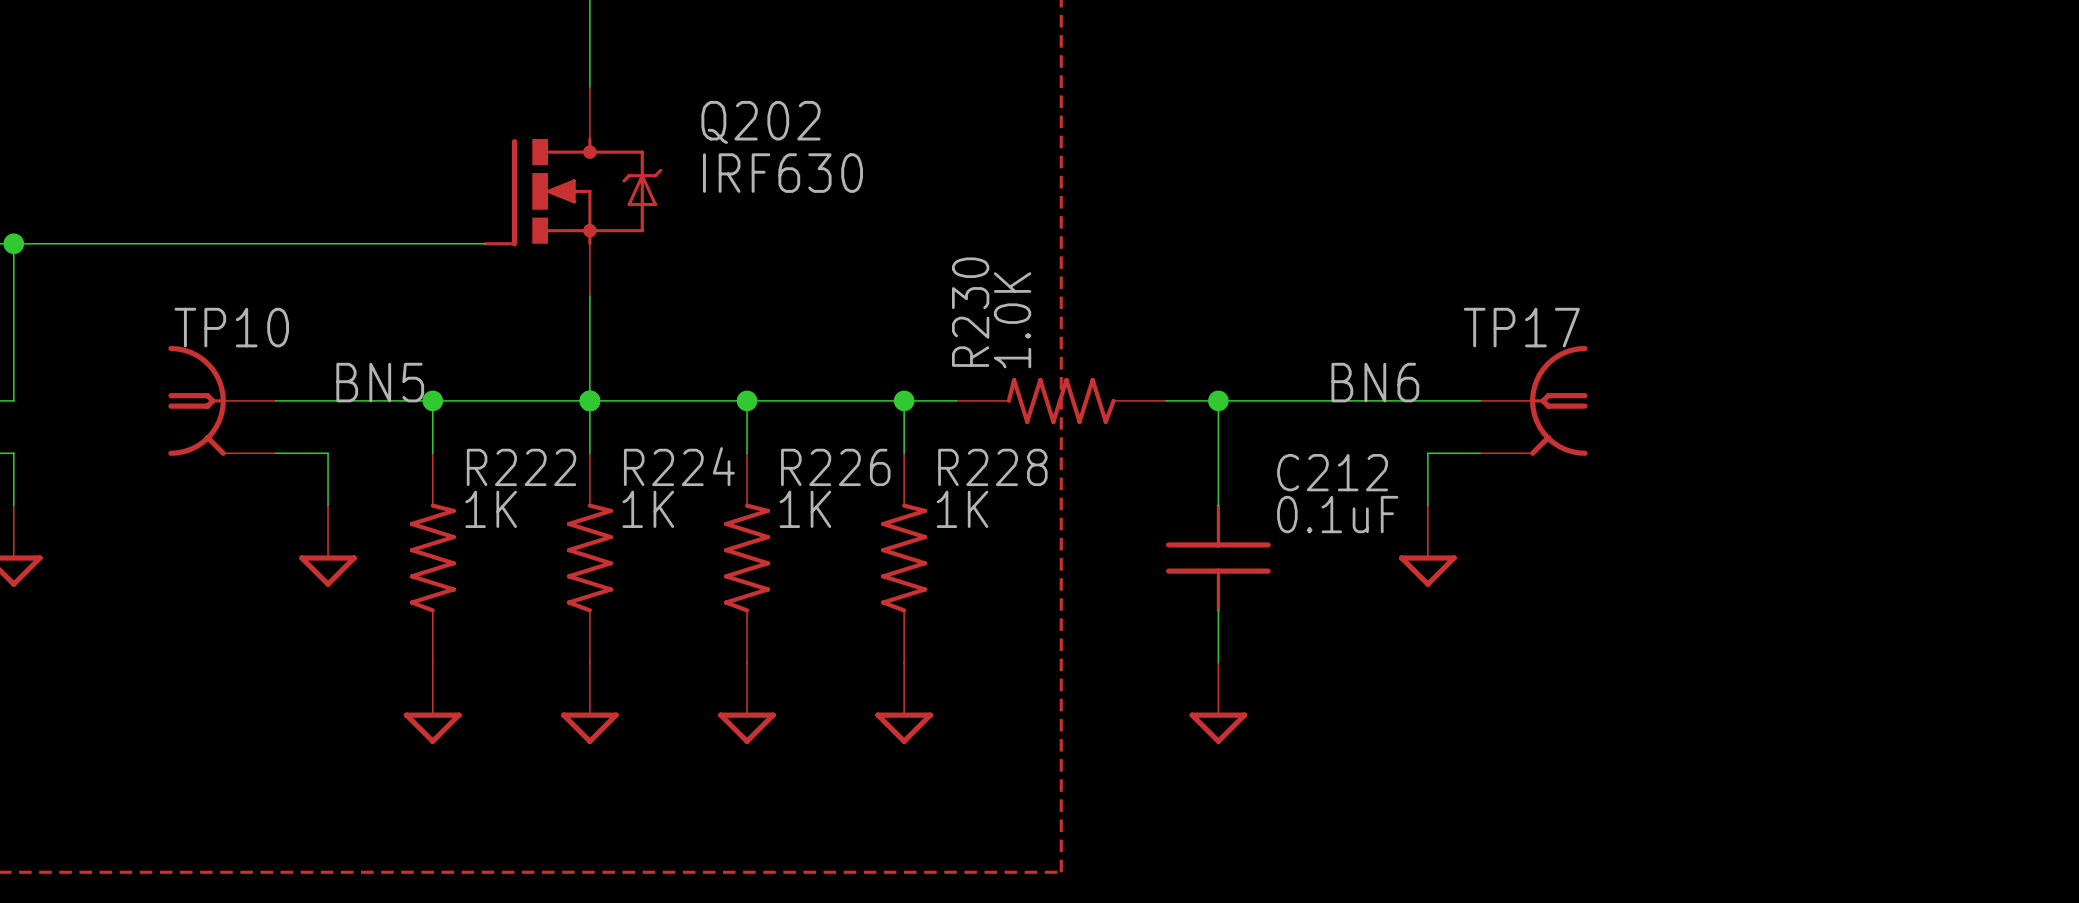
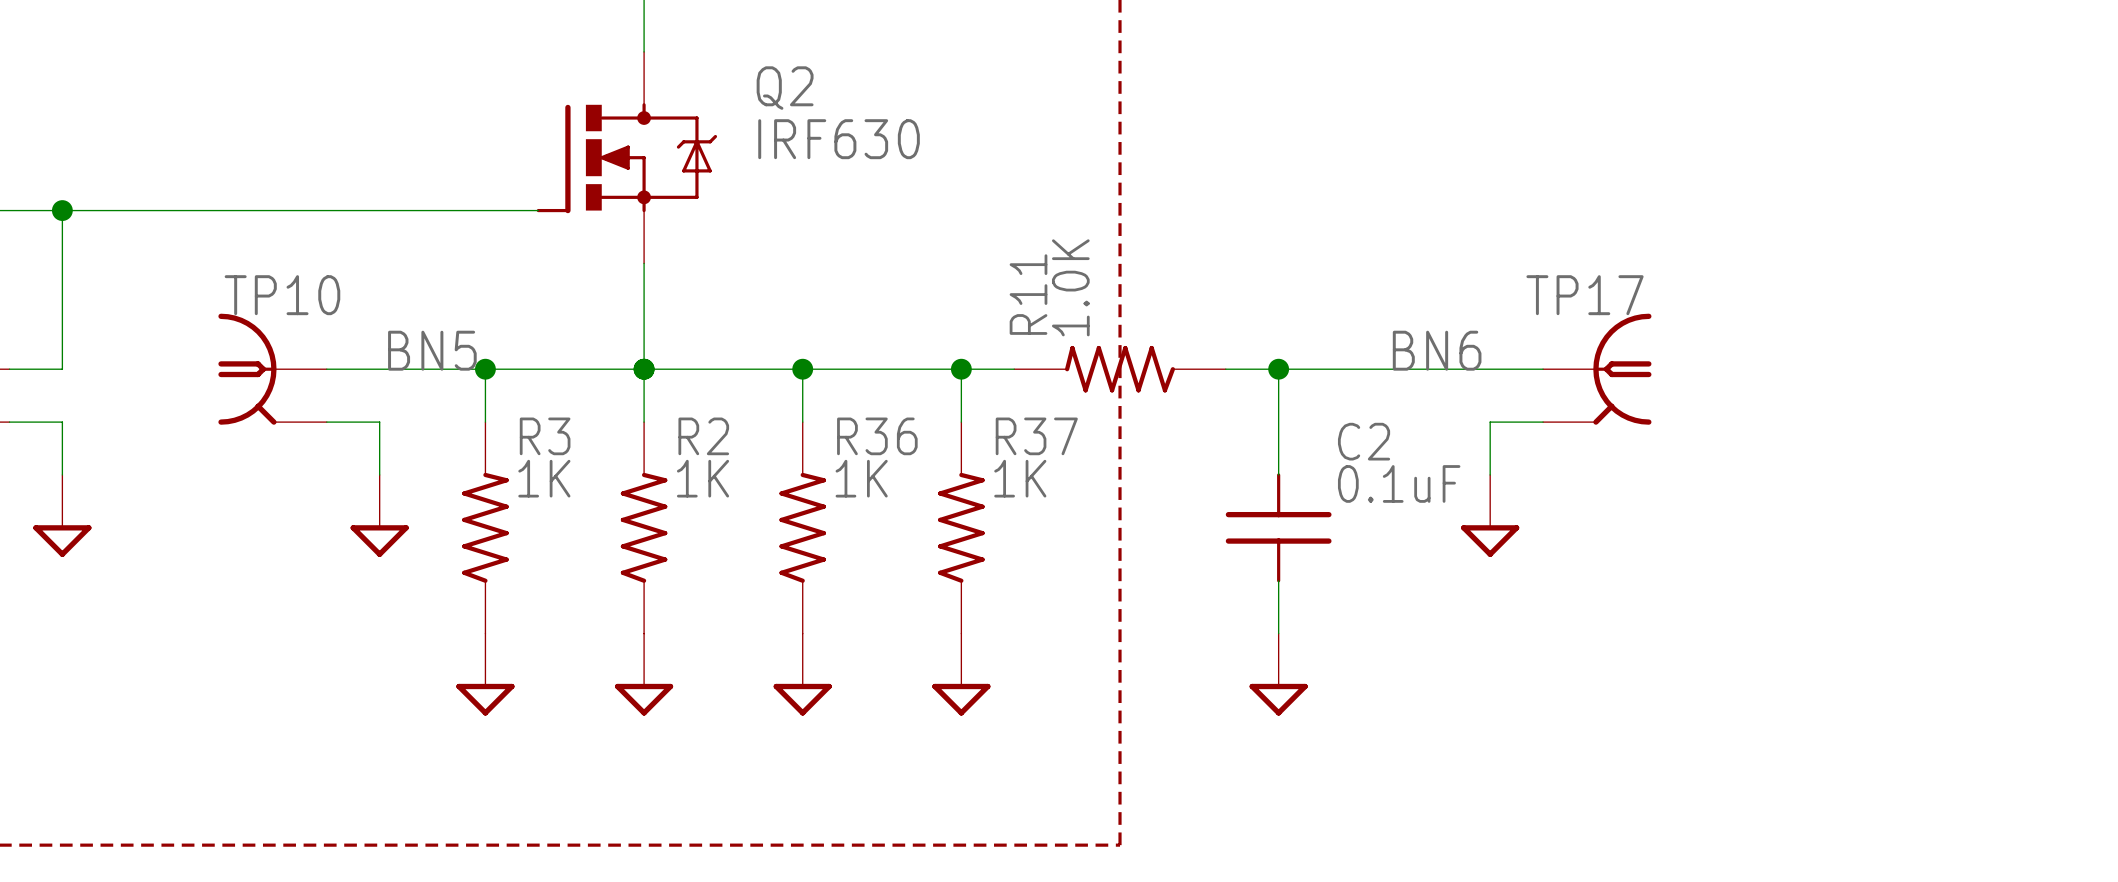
Q202 name: Q202 (760, 122) -> Q2 (785, 88)
R230 name: R230 (970, 312) -> R11 (1028, 294)
R224 name: R224 (679, 466) -> R2 (703, 436)
R222 name: R222 (521, 467) -> R3 (545, 436)
R226 name: R226 (835, 467) -> R36 (877, 436)
R228 name: R228 (992, 467) -> R37 (1036, 436)
C212 name: C212 (1332, 472) -> C2 (1364, 441)

